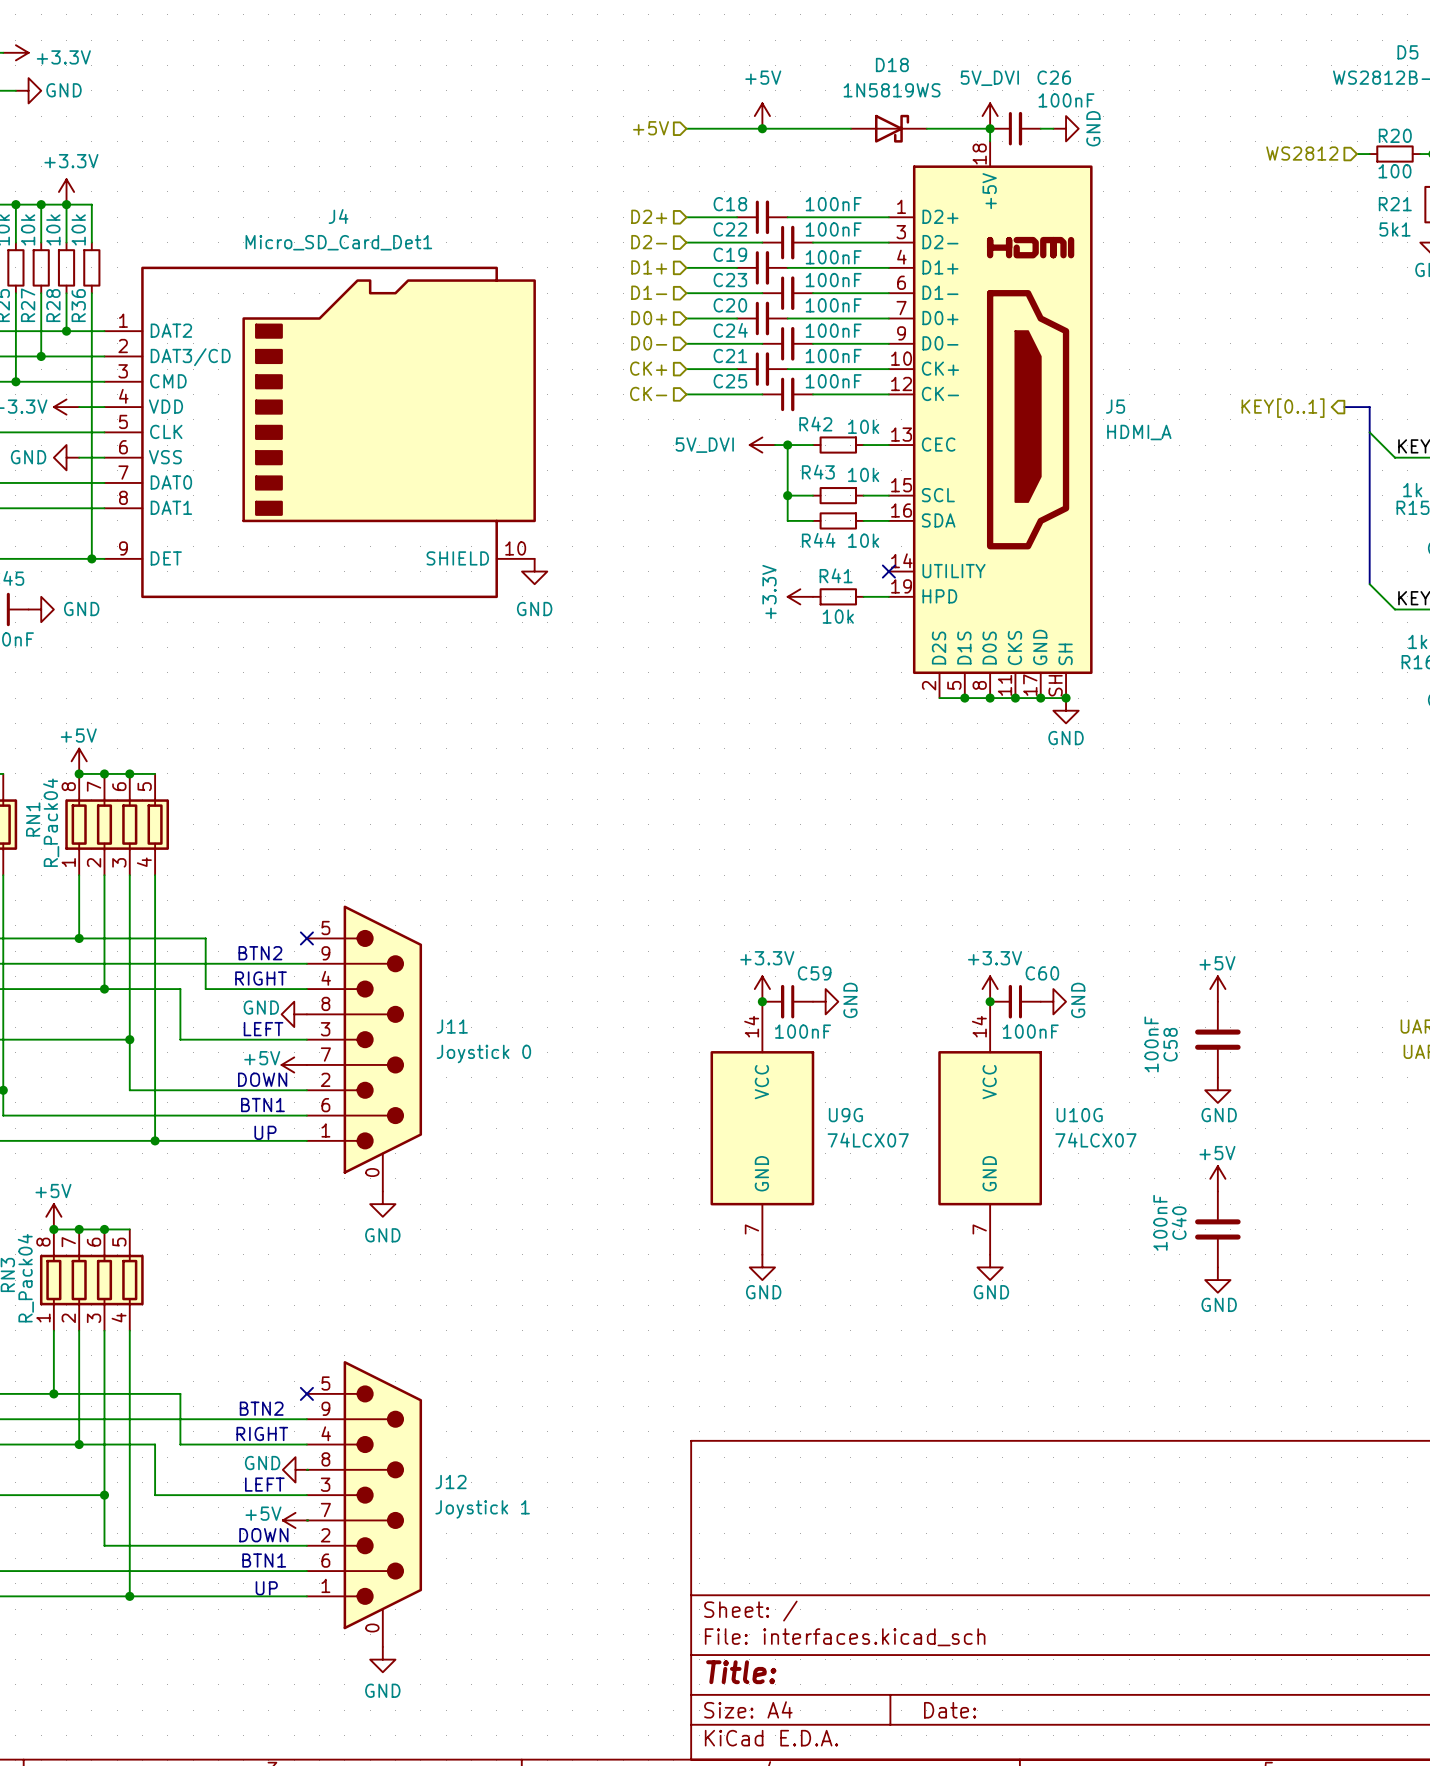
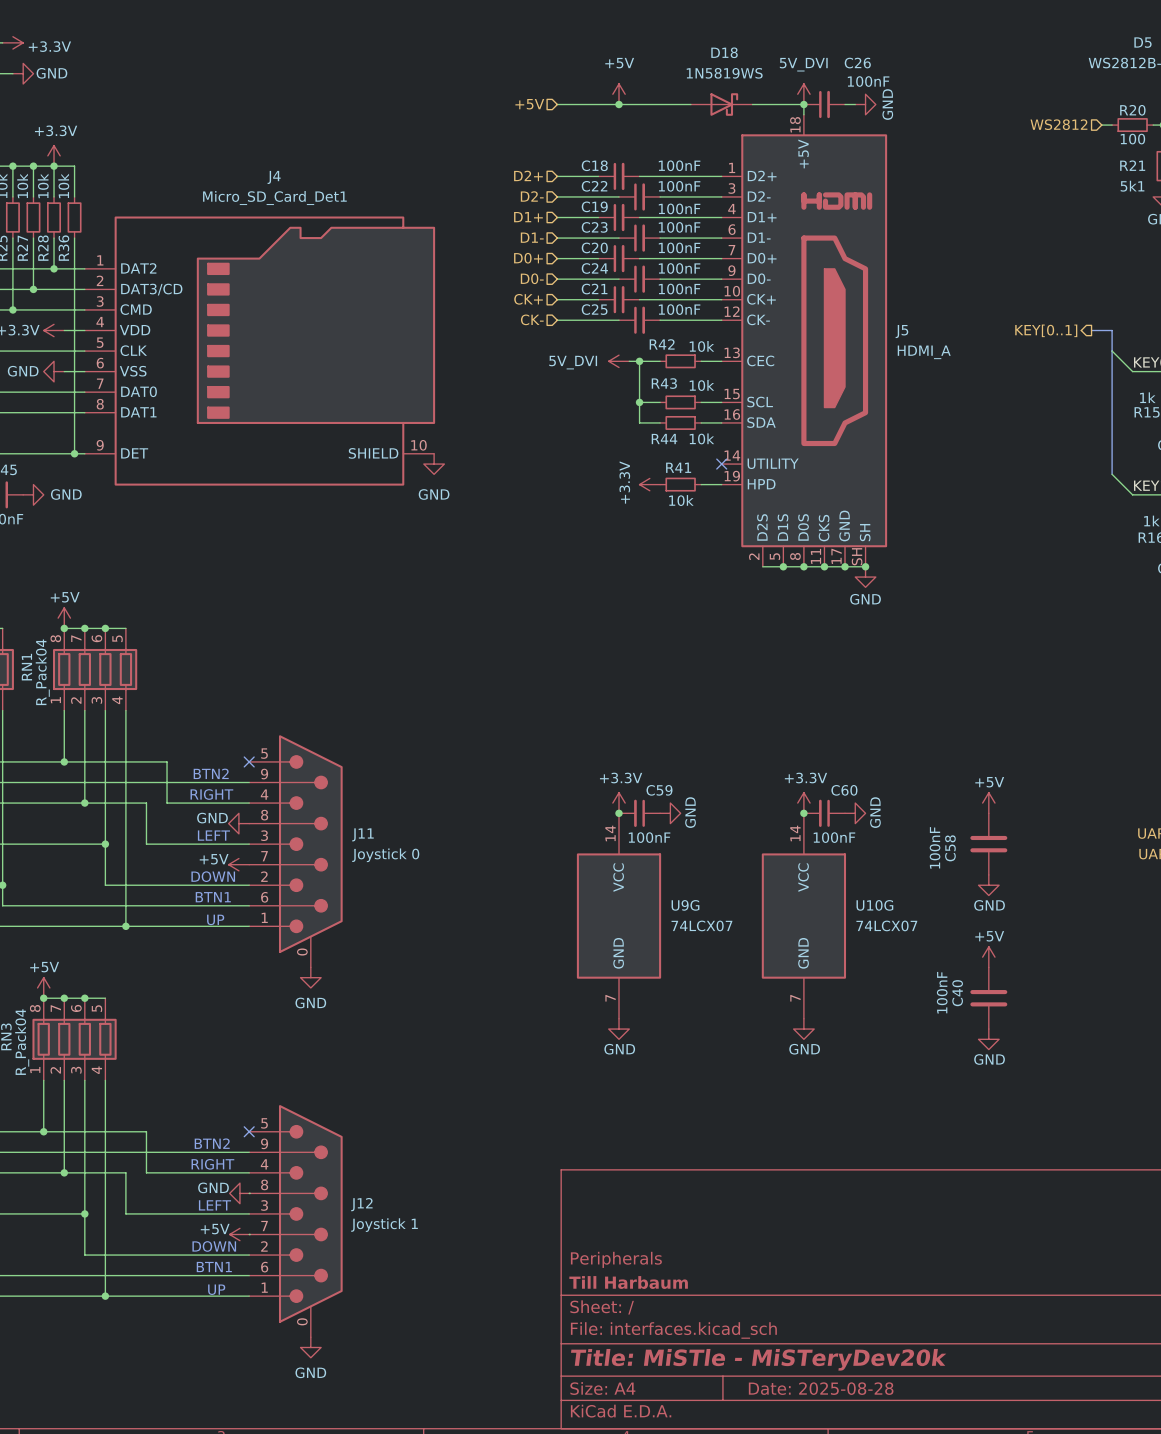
title block: none -> Peripherals (616, 1259)
title block: none -> Till Harbaum (628, 1282)
title block: Title: (741, 1672) -> Title: MiSTle - MiSTeryDev20k (758, 1359)
title block: Date: (950, 1710) -> Date: 2025-08-28 (821, 1388)

